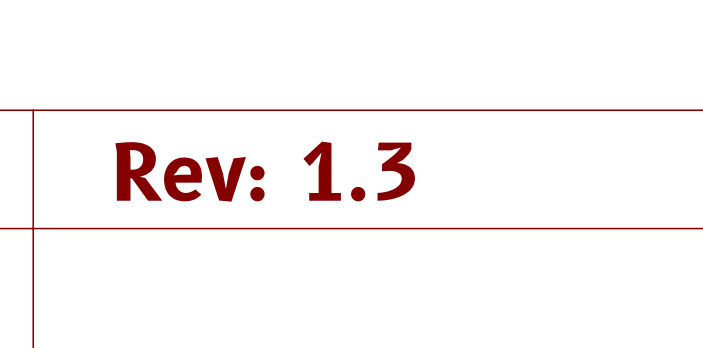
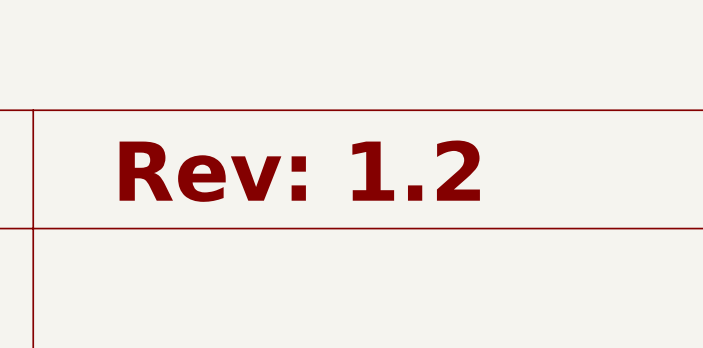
title block: Rev: 1.3 (265, 171) -> Rev: 1.2 (299, 171)

